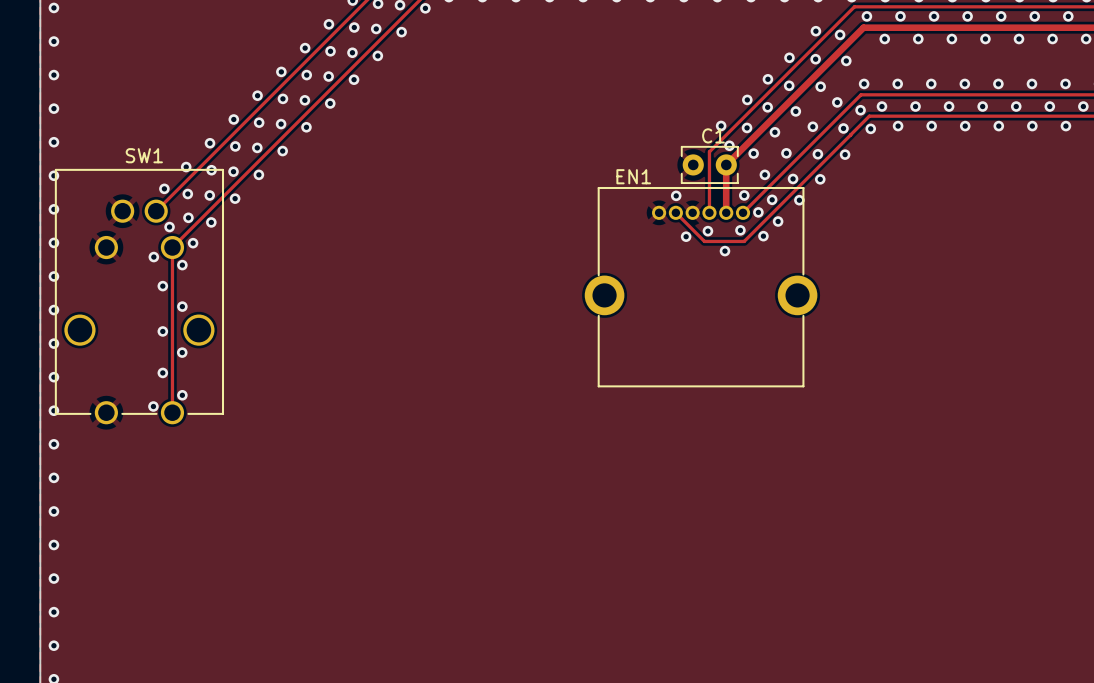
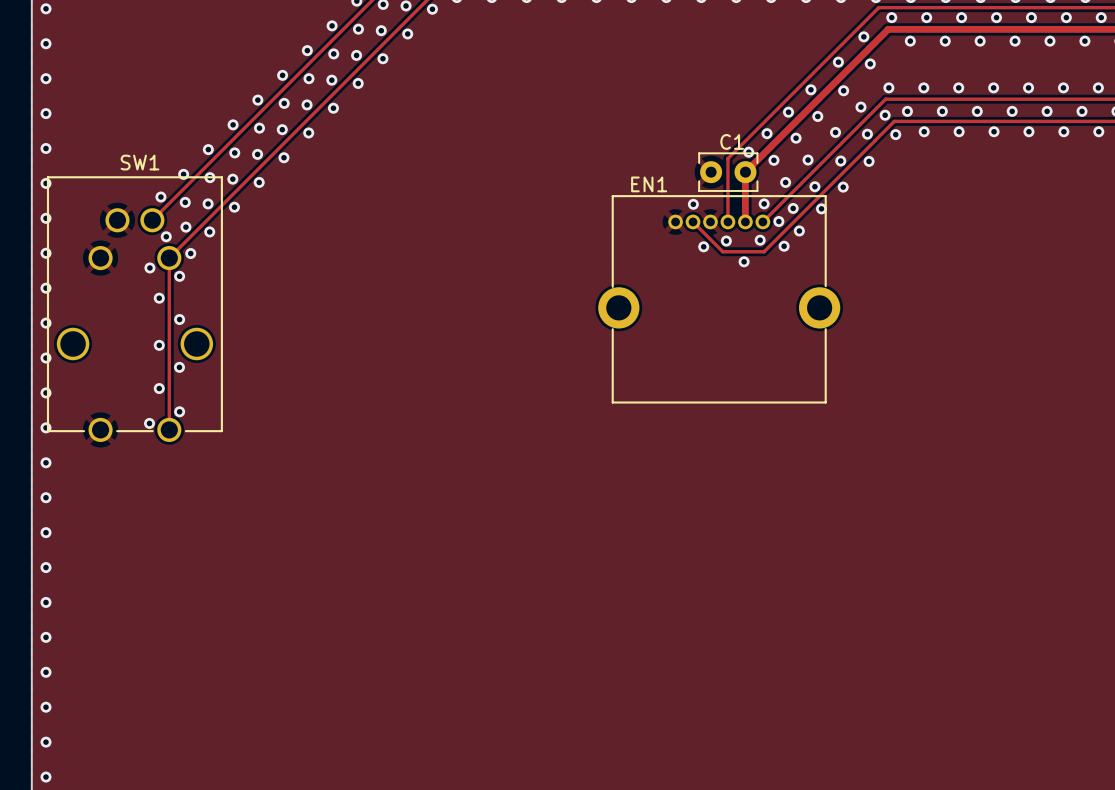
via: (815, 31) -> none
via: (789, 57) -> none
via: (767, 79) -> none
via: (747, 99) -> none
via: (721, 125) -> none

